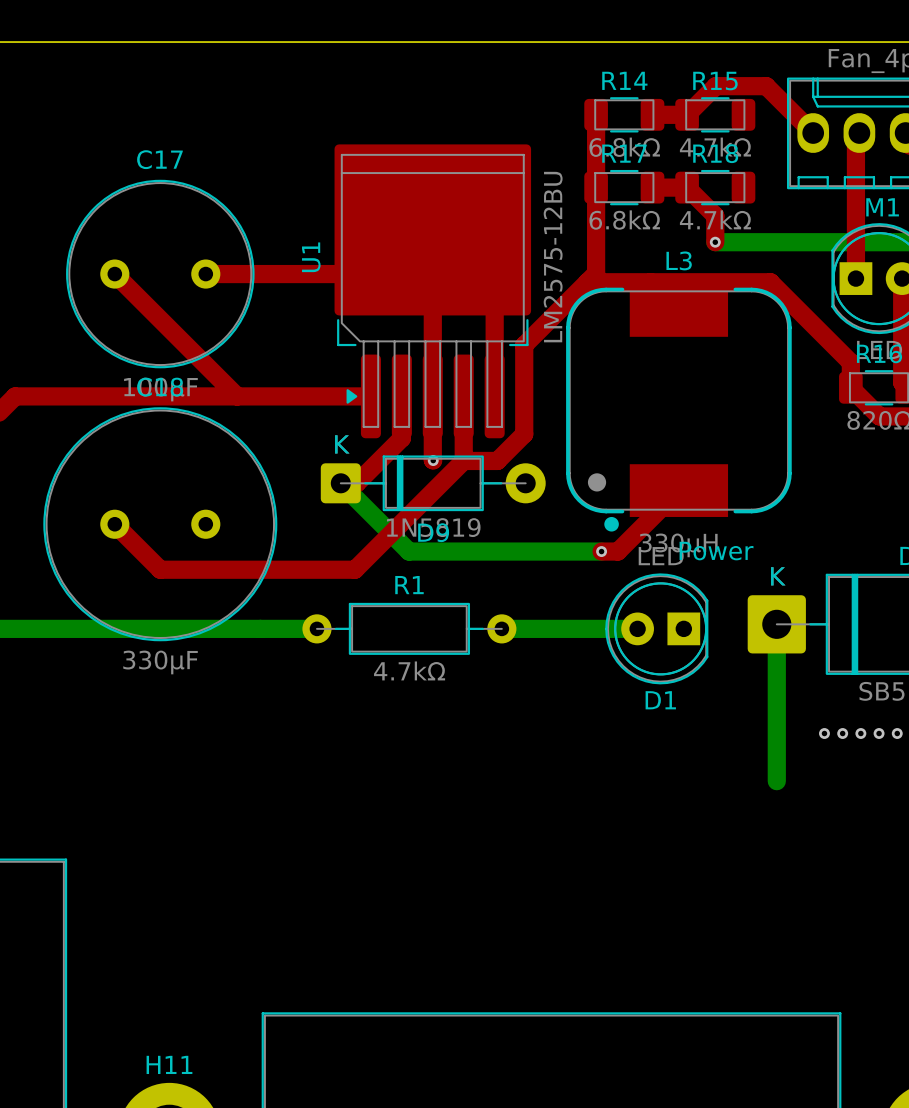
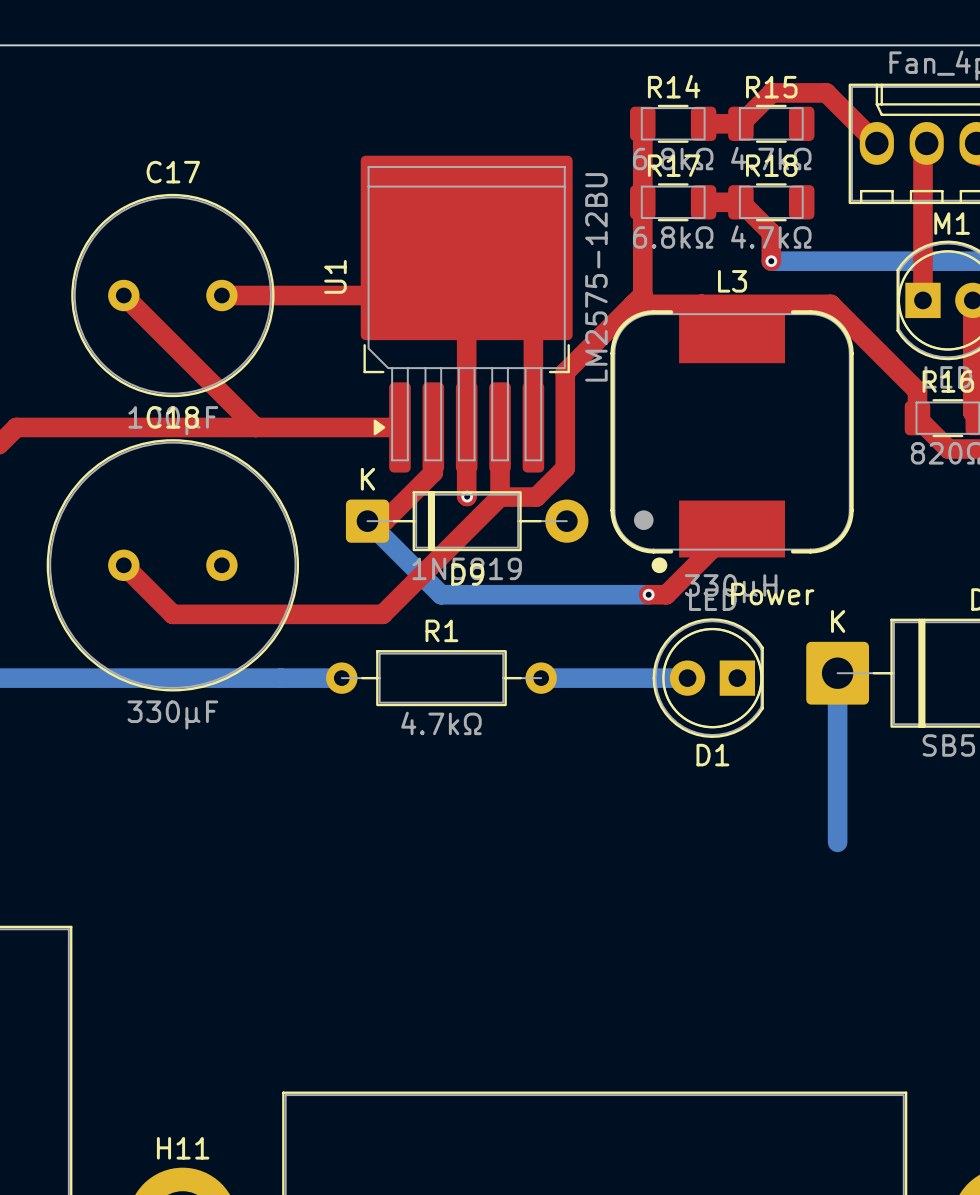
via: (824, 733) -> none
via: (842, 733) -> none
via: (860, 733) -> none
via: (879, 733) -> none
via: (897, 733) -> none

